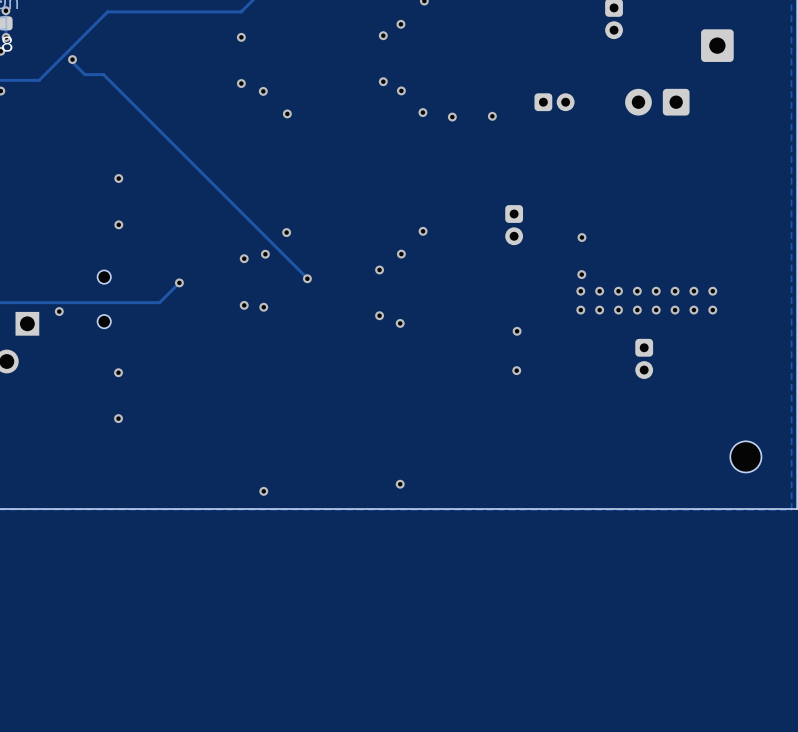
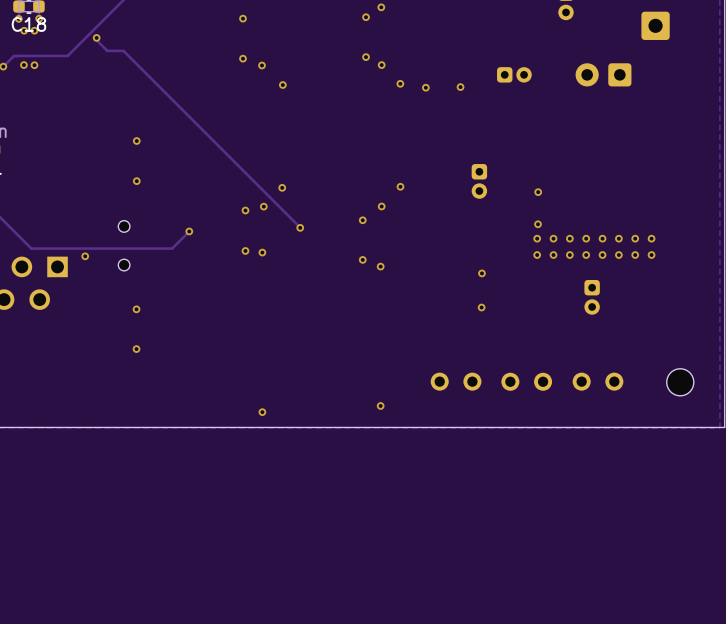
part: none -> (456, 381)
part: none -> (526, 381)
part: none -> (598, 381)

